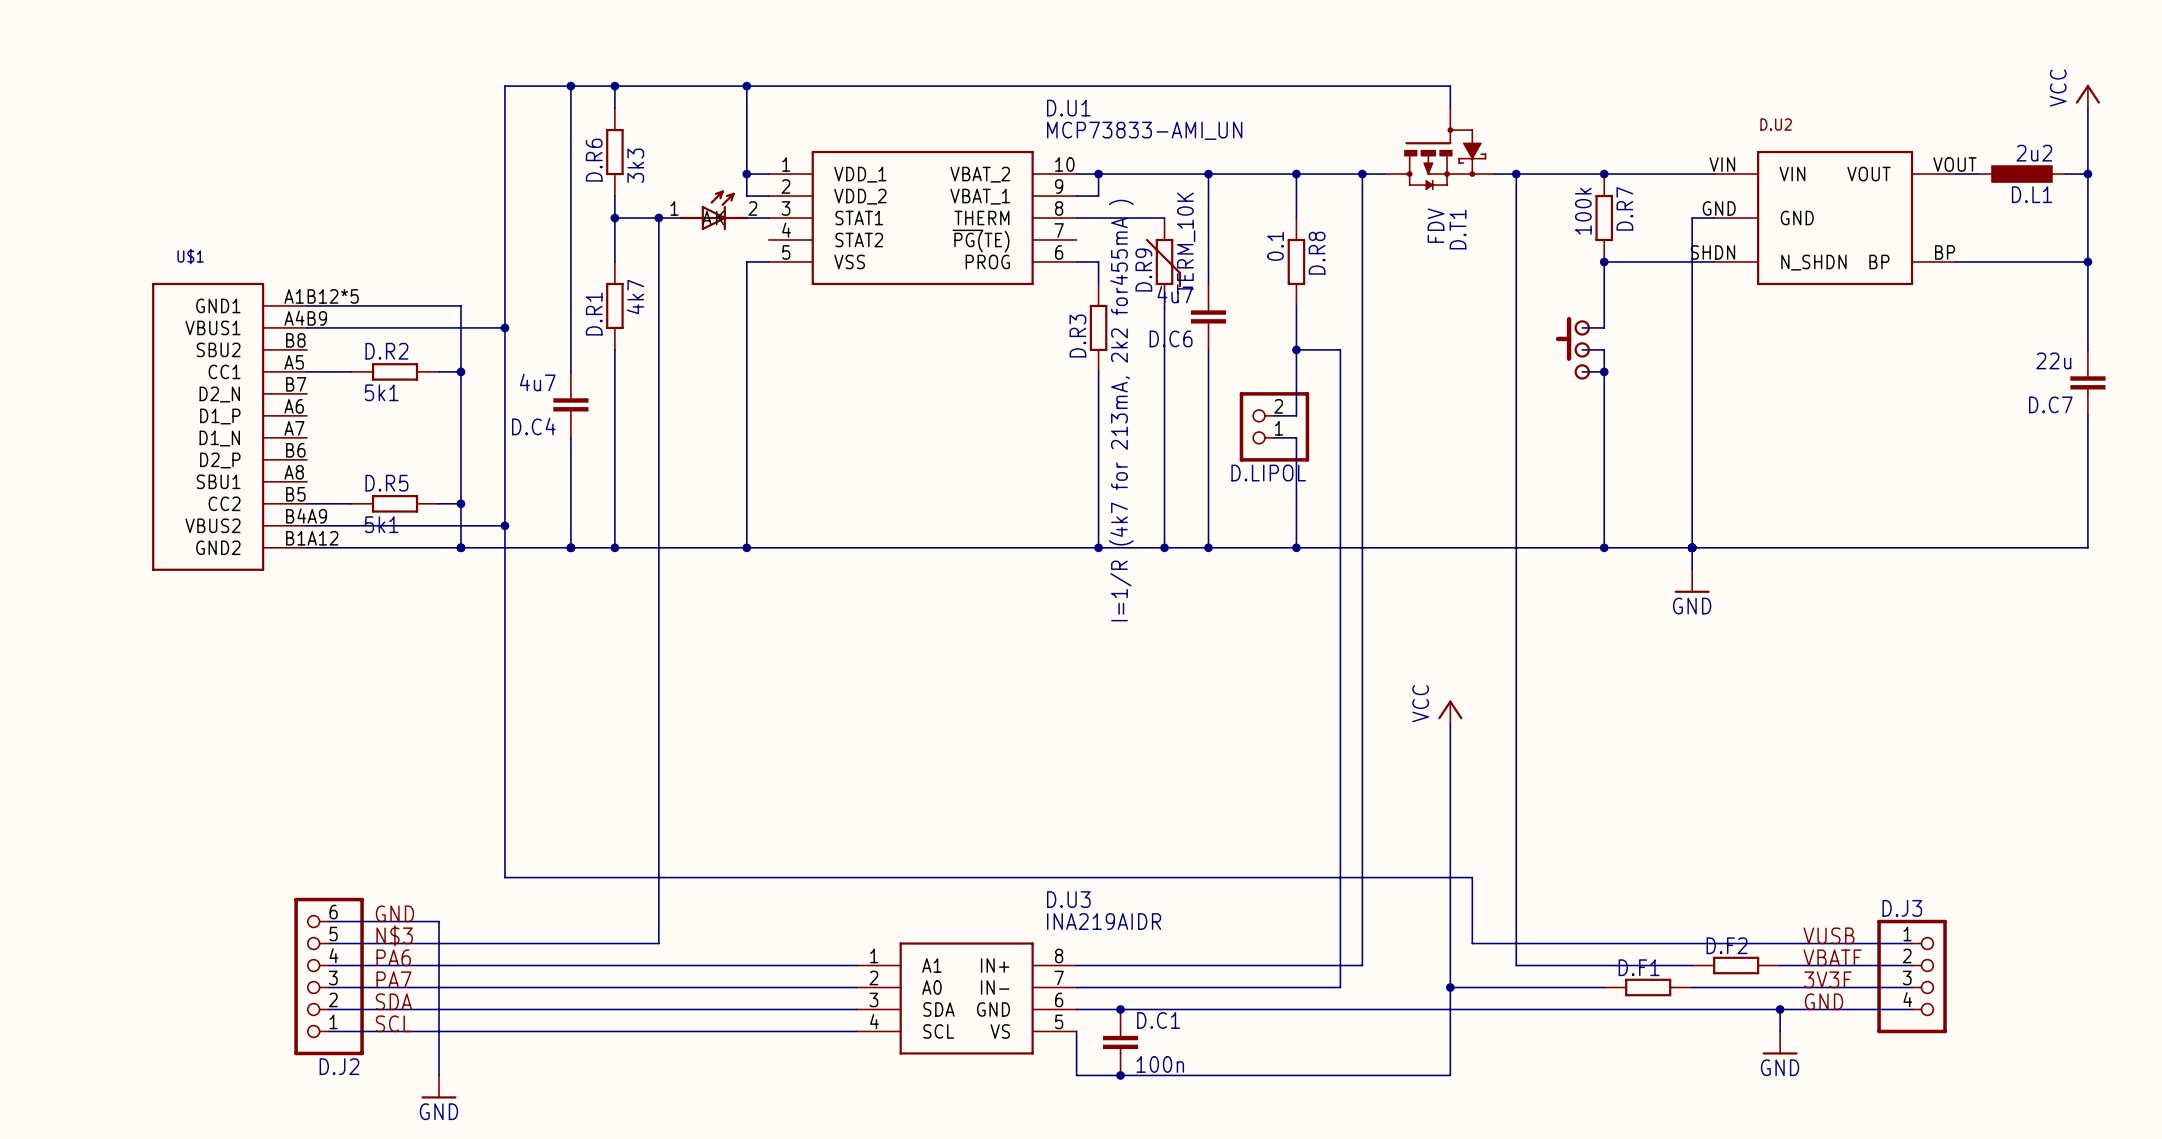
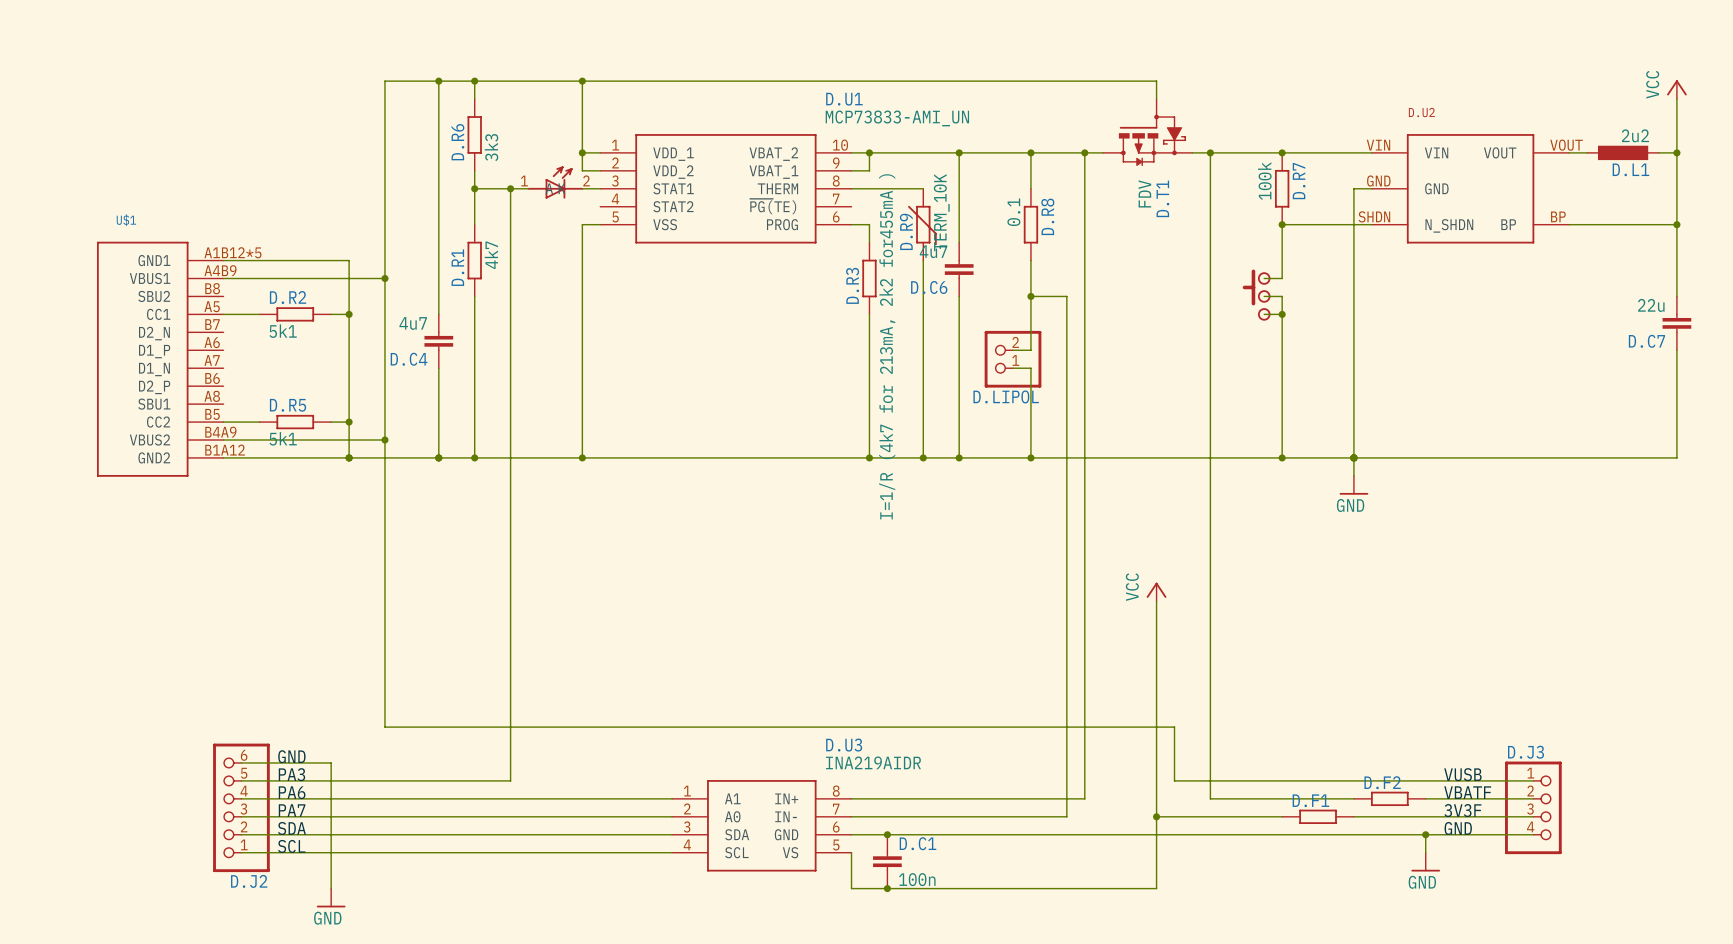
label: N$3 (394, 935) -> PA3 (291, 774)

